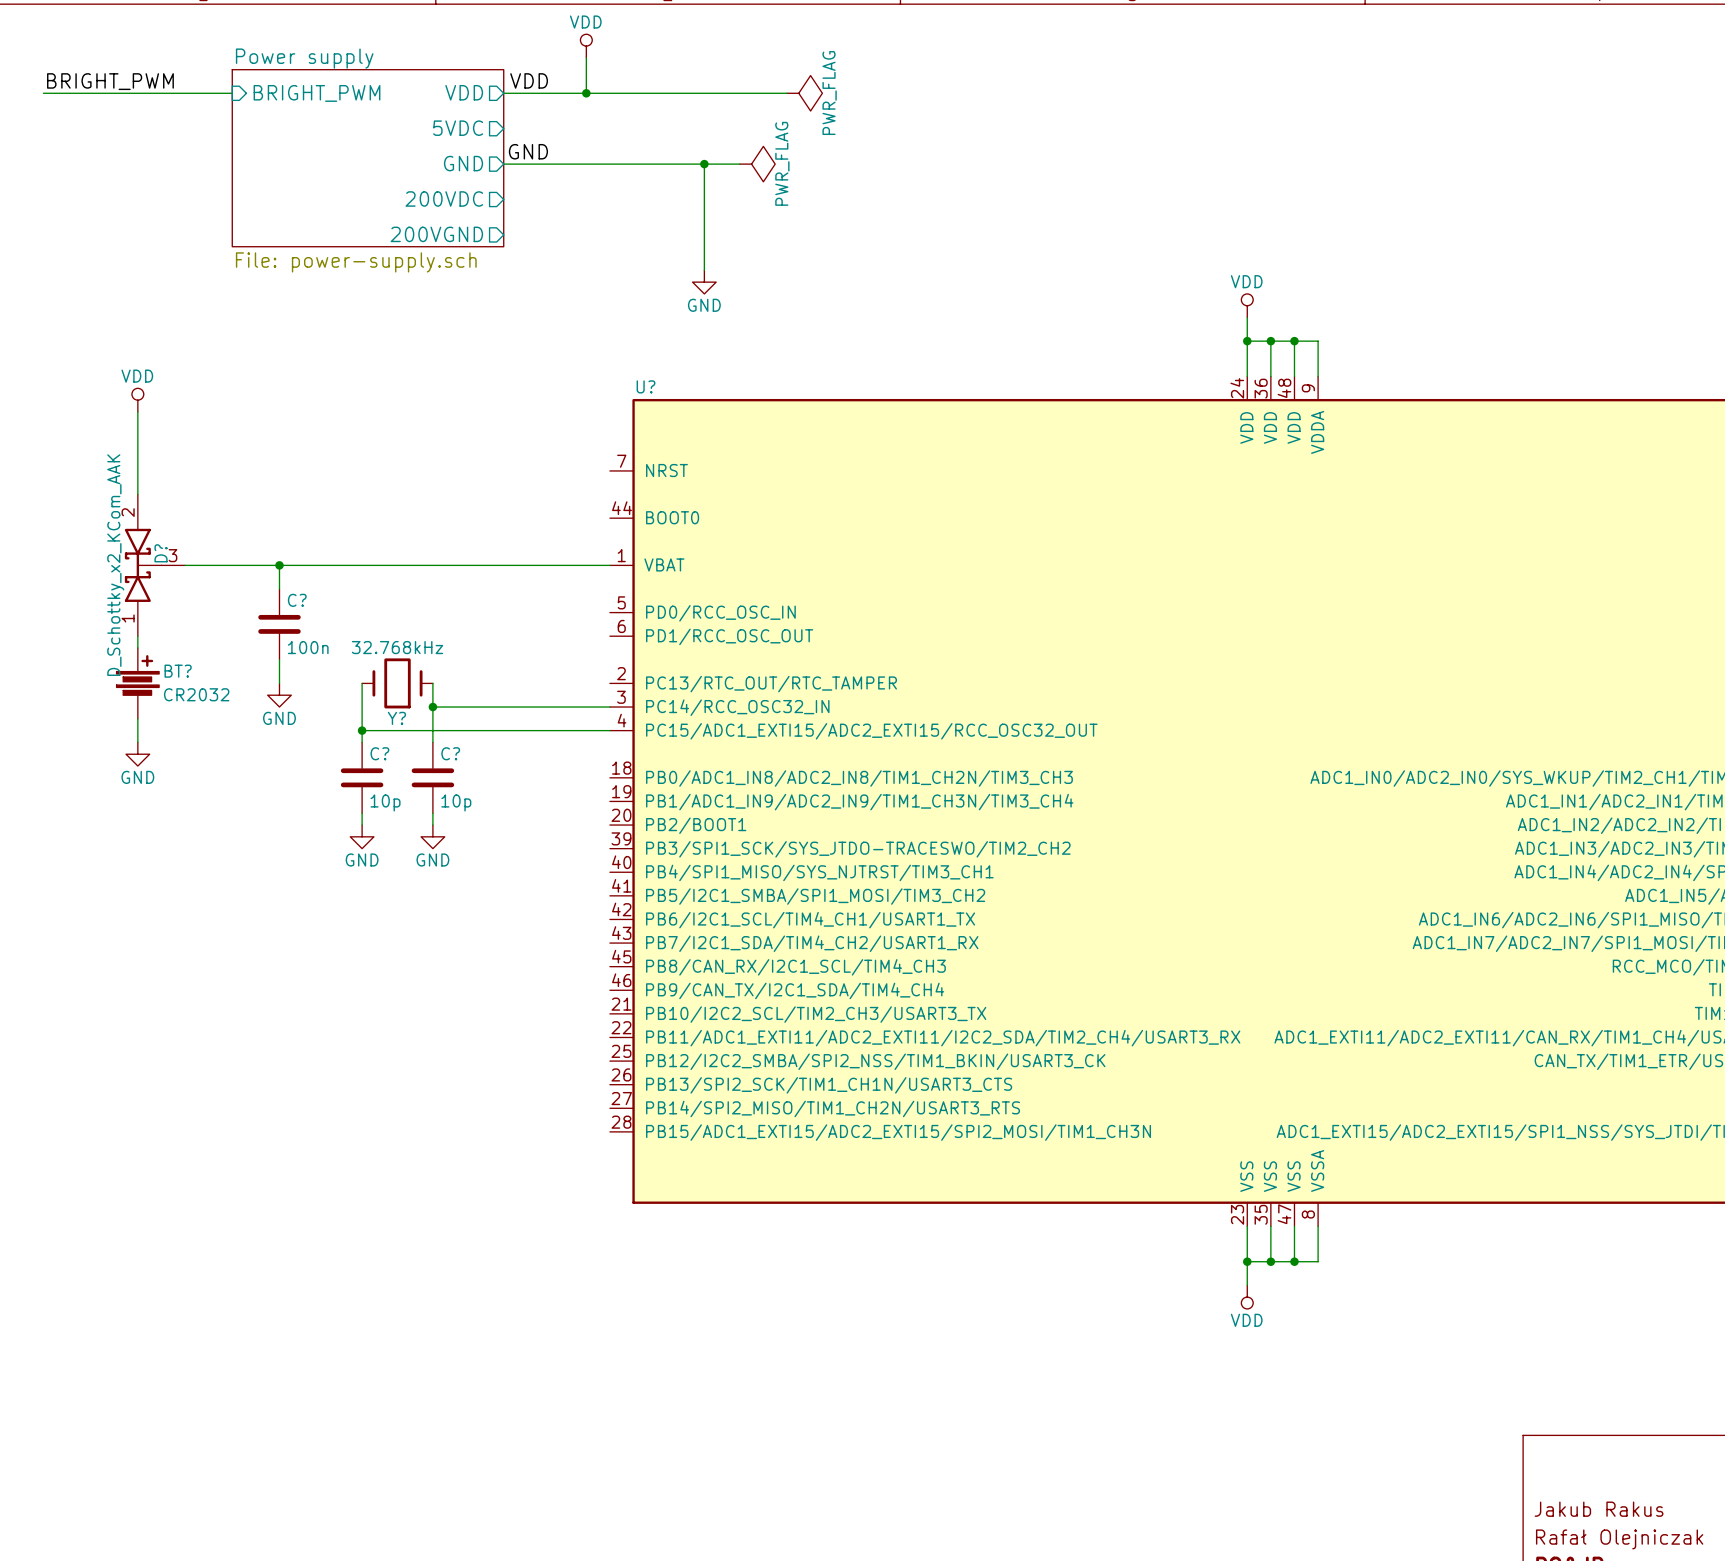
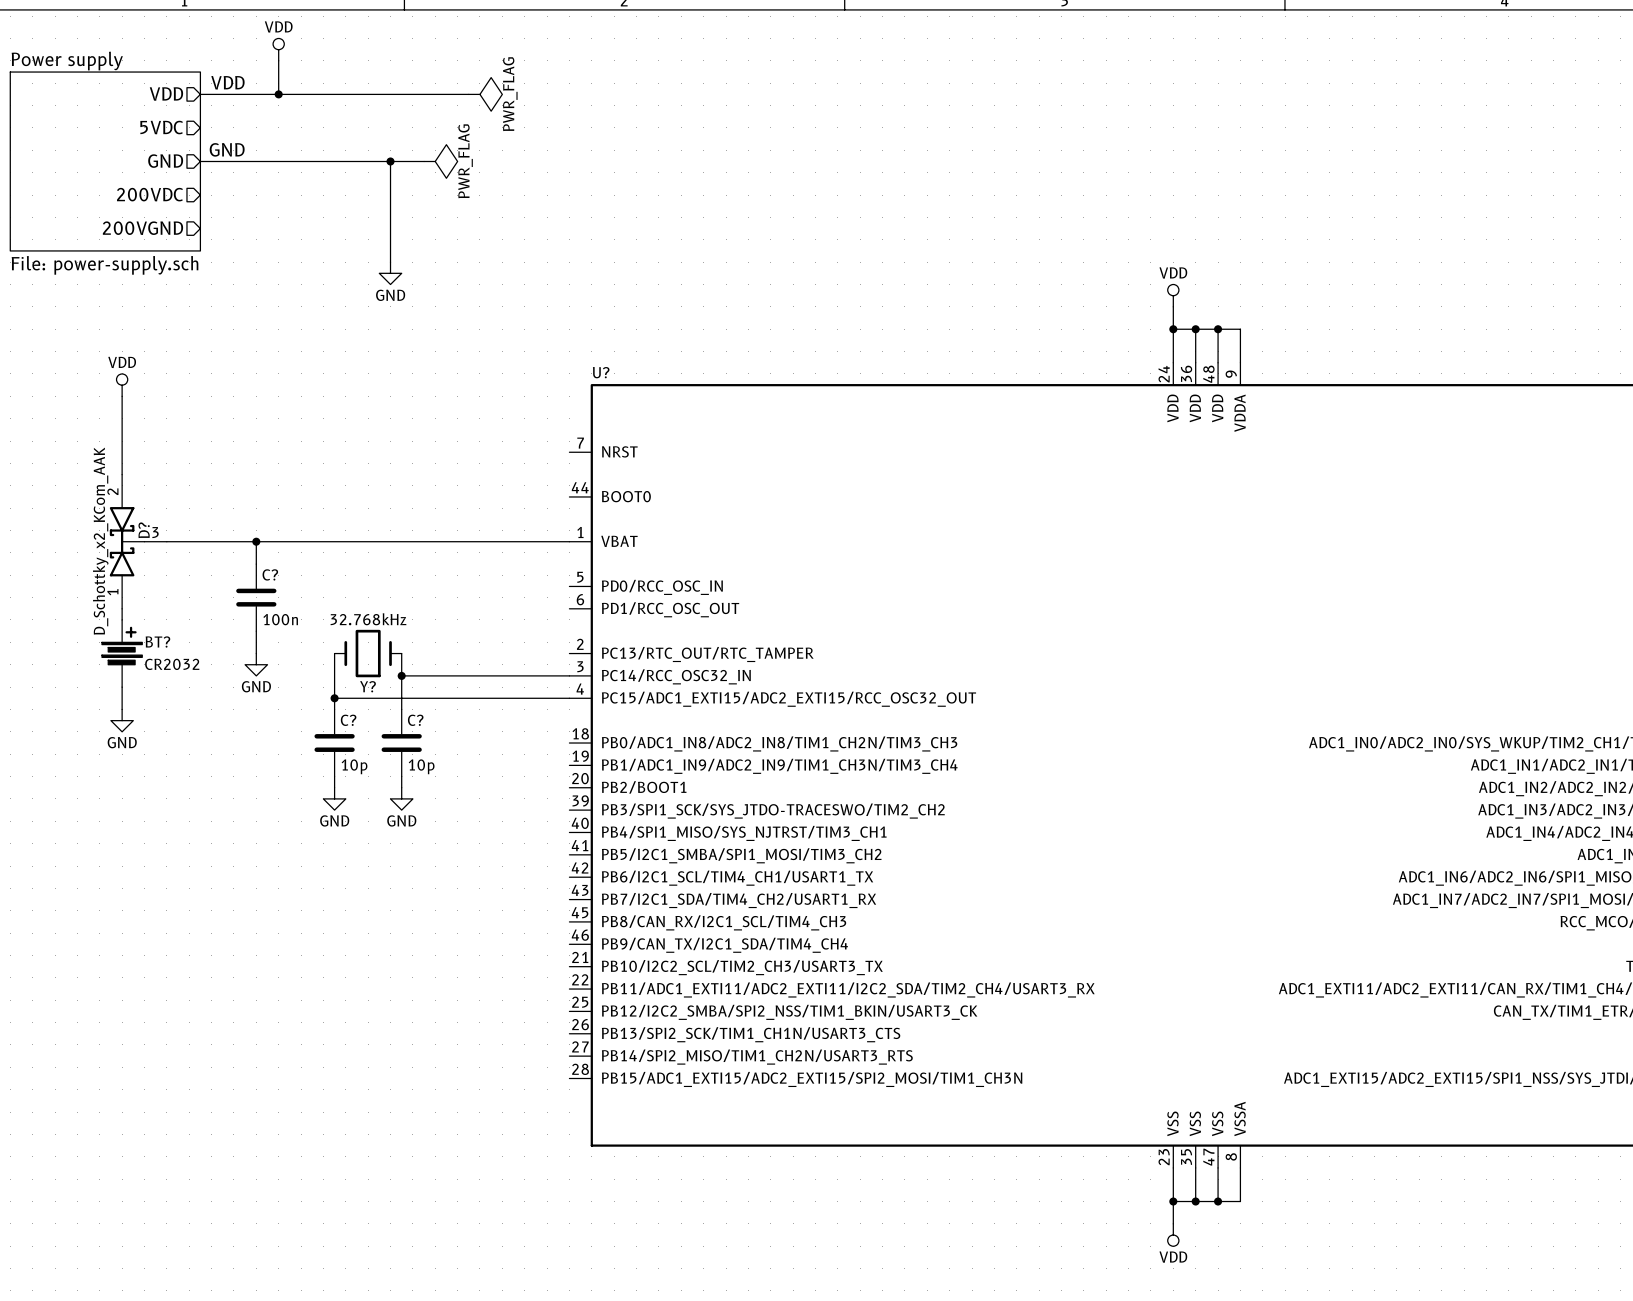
power symbol: none -> VDD (278, 49)
power symbol: VDD (586, 46) -> none
wire: none -> (278, 60) (278, 94)
wire: (586, 57) (586, 93) -> none
label: none -> VDD (227, 82)
label: VDD (529, 80) -> none
label: BRIGHT_PWM (110, 81) -> none
sheet pin: none -> VDD (166, 93)
sheet pin: VDD (464, 92) -> none
wire: (43, 93) (220, 93) -> none
junction: none -> (278, 94)
sheet pin: BRIGHT_PWM (317, 93) -> none
wire: (503, 93) (786, 93) -> (468, 94) (211, 94)
power symbol: none -> PWR_FLAG (485, 94)
junction: (586, 93) -> none
power symbol: PWR_FLAG (804, 93) -> none
sheet pin: none -> 5VDC (161, 127)
sheet pin: 5VDC (458, 128) -> none
label: none -> GND (227, 149)
label: GND (528, 151) -> none
sheet Power supply: File: power-supply.sch (368, 158) -> none
sheet pin: none -> GND (165, 161)
sheet pin: GND (463, 163) -> none
sheet Power supply: none -> File: power-supply.sch (105, 161)
wire: none -> (200, 161) (424, 161)
wire: none -> (390, 161) (390, 262)
junction: none -> (390, 161)
power symbol: none -> PWR_FLAG (440, 161)
wire: (503, 164) (739, 164) -> none
wire: (704, 164) (704, 270) -> none
junction: (704, 164) -> none
power symbol: PWR_FLAG (757, 164) -> none
sheet pin: none -> 200VDC (149, 194)
sheet pin: 200VDC (444, 198) -> none
sheet pin: none -> 200VGND (142, 228)
sheet pin: 200VGND (436, 234) -> none
power symbol: none -> GND (390, 273)
power symbol: GND (704, 282) -> none

